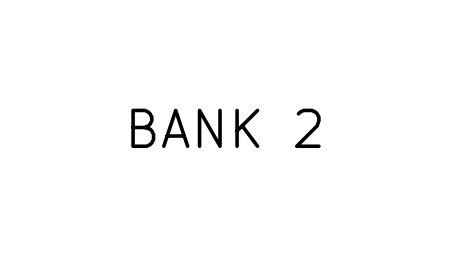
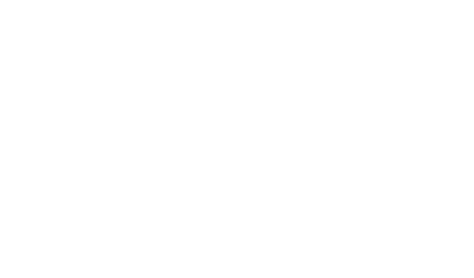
text: BANK 2 (225, 128) -> none

